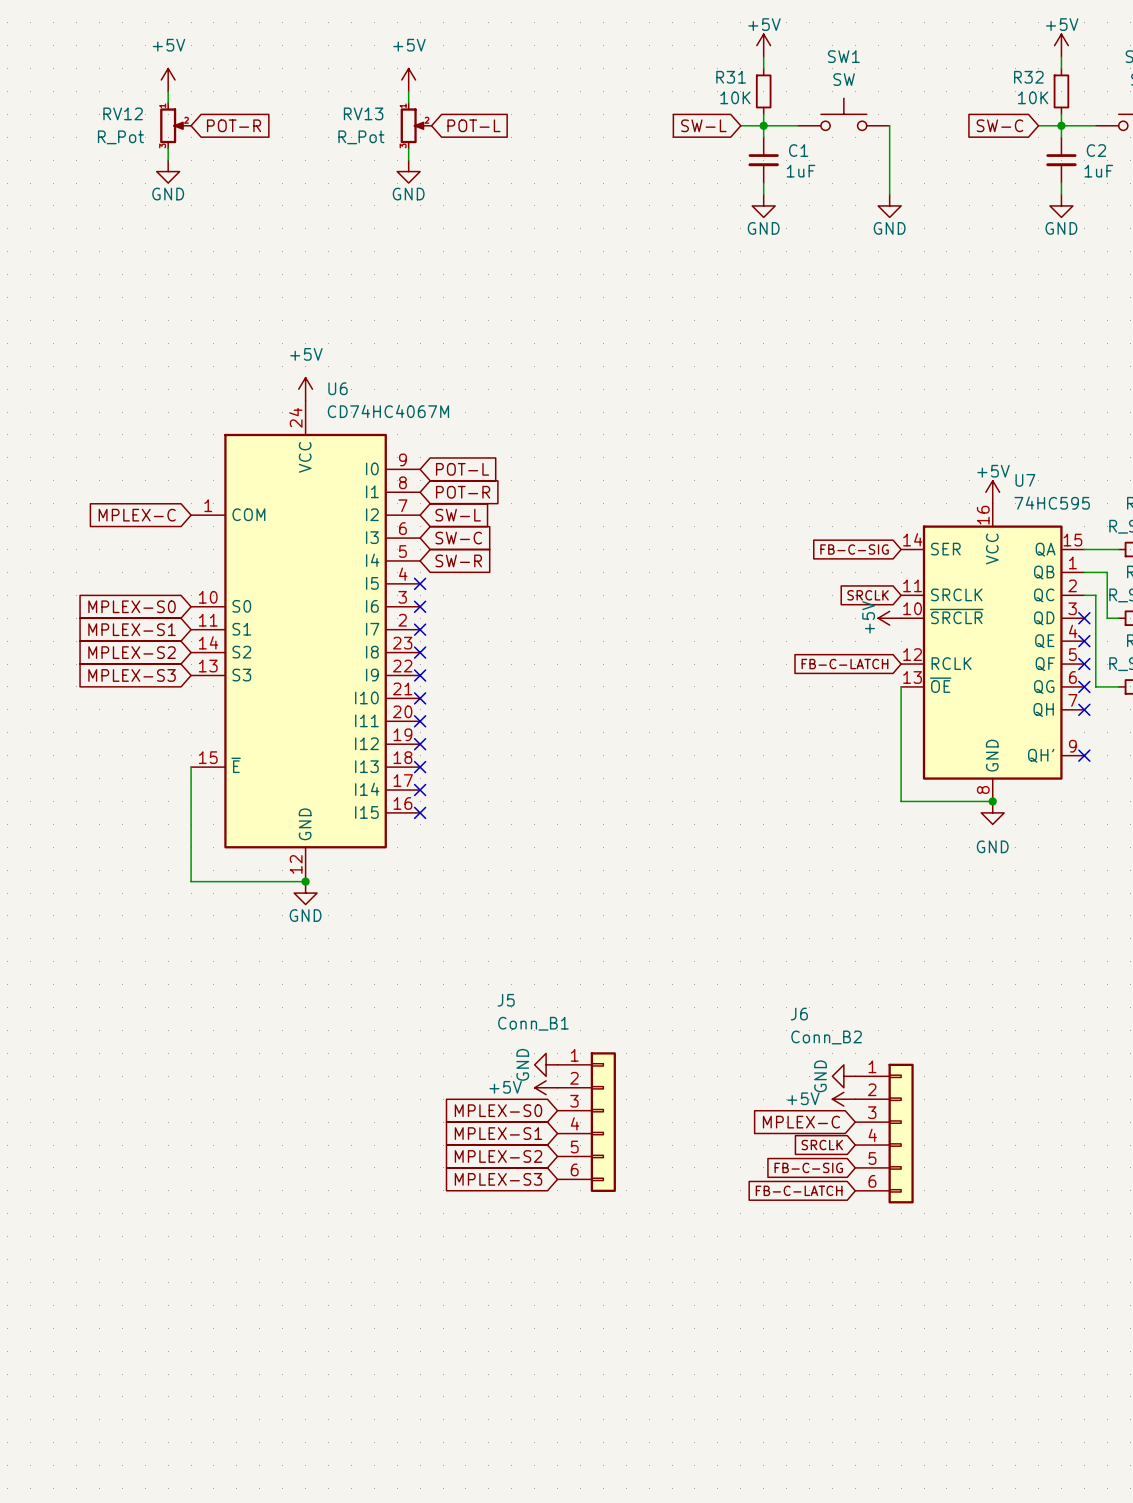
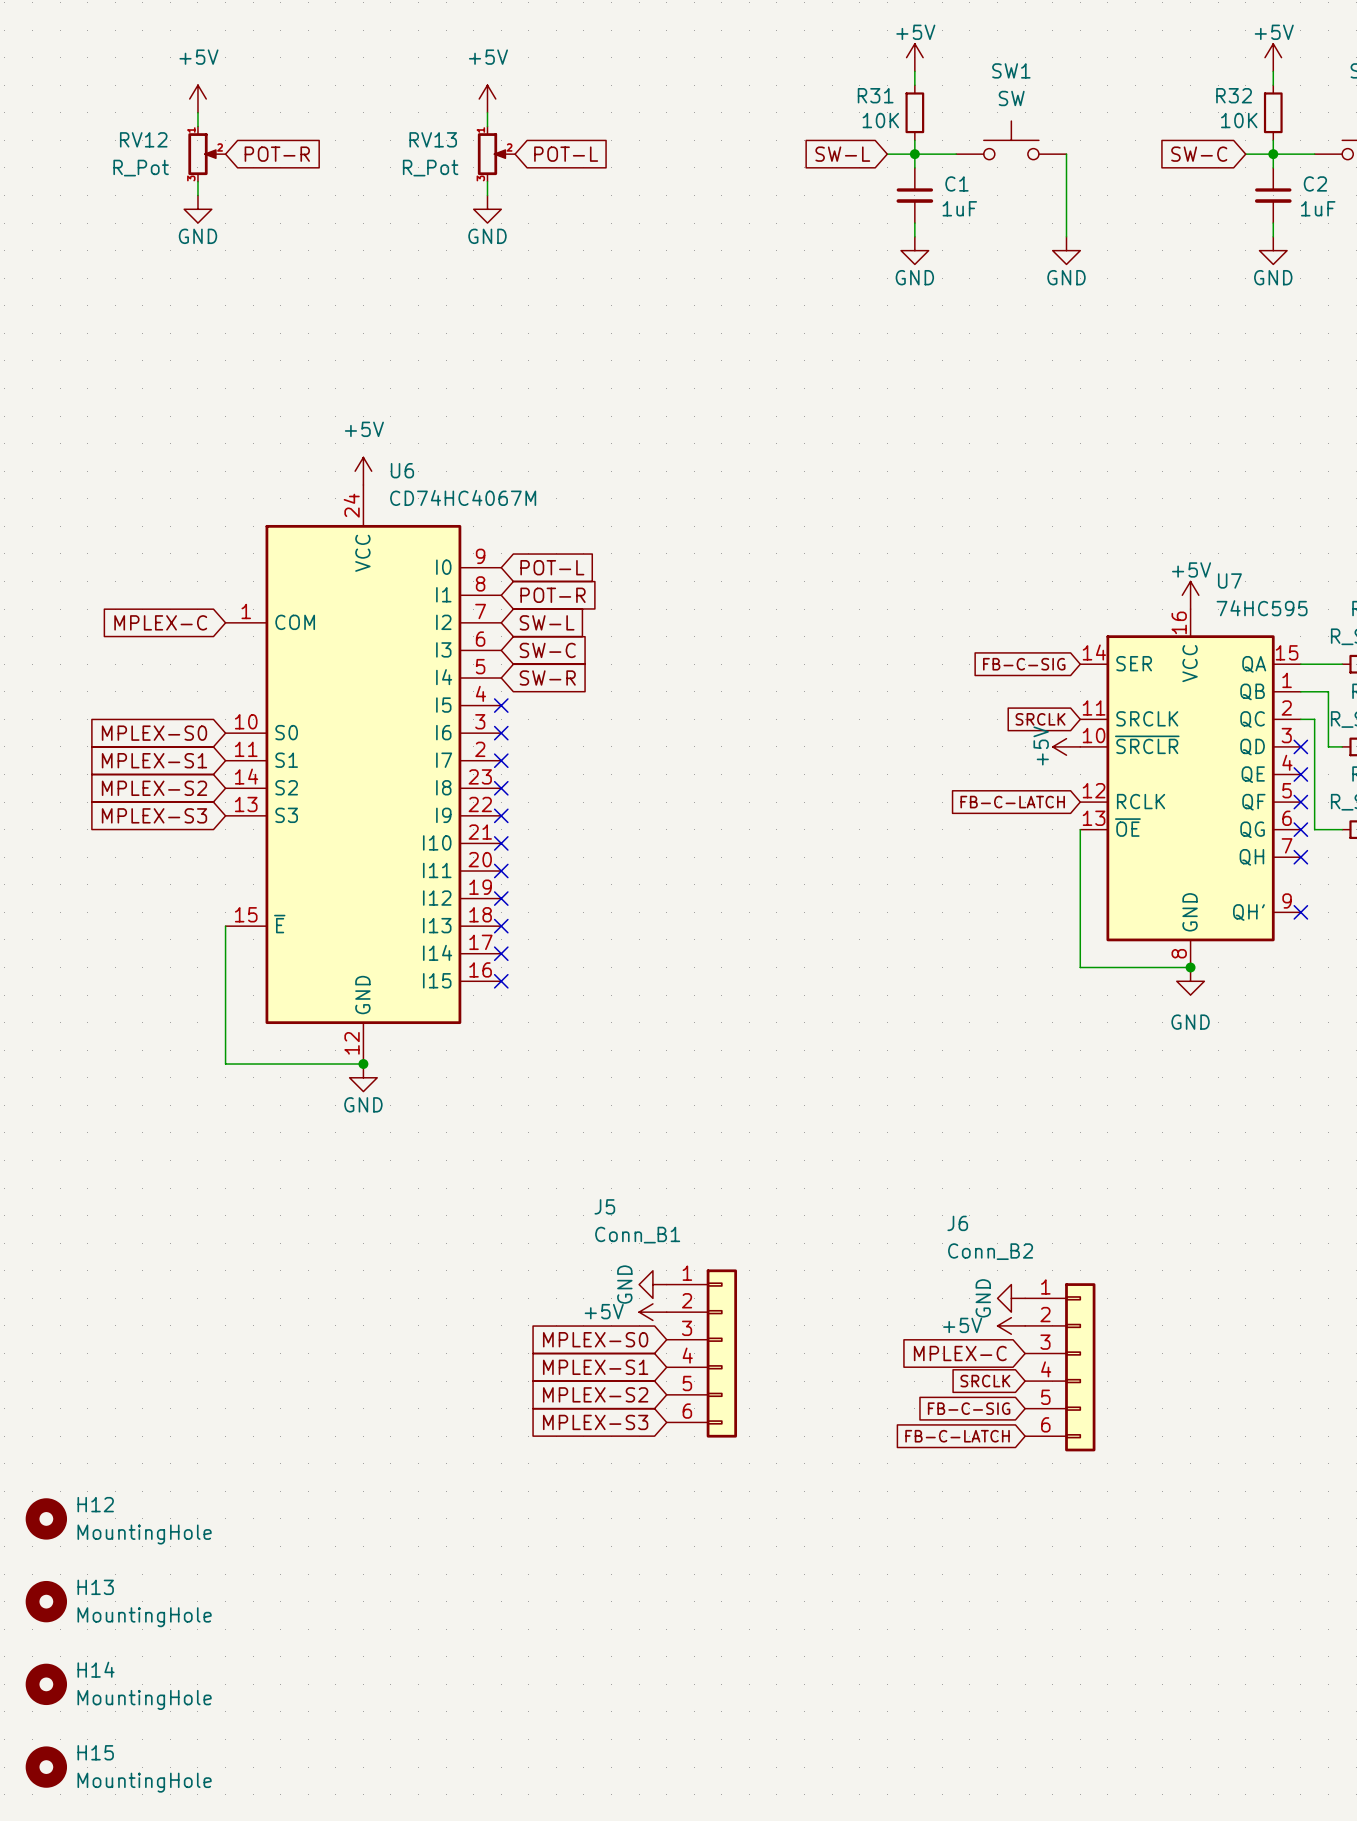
H12: none -> MountingHole (46, 1518)
H13: none -> MountingHole (46, 1601)
H14: none -> MountingHole (46, 1684)
H15: none -> MountingHole (46, 1767)

